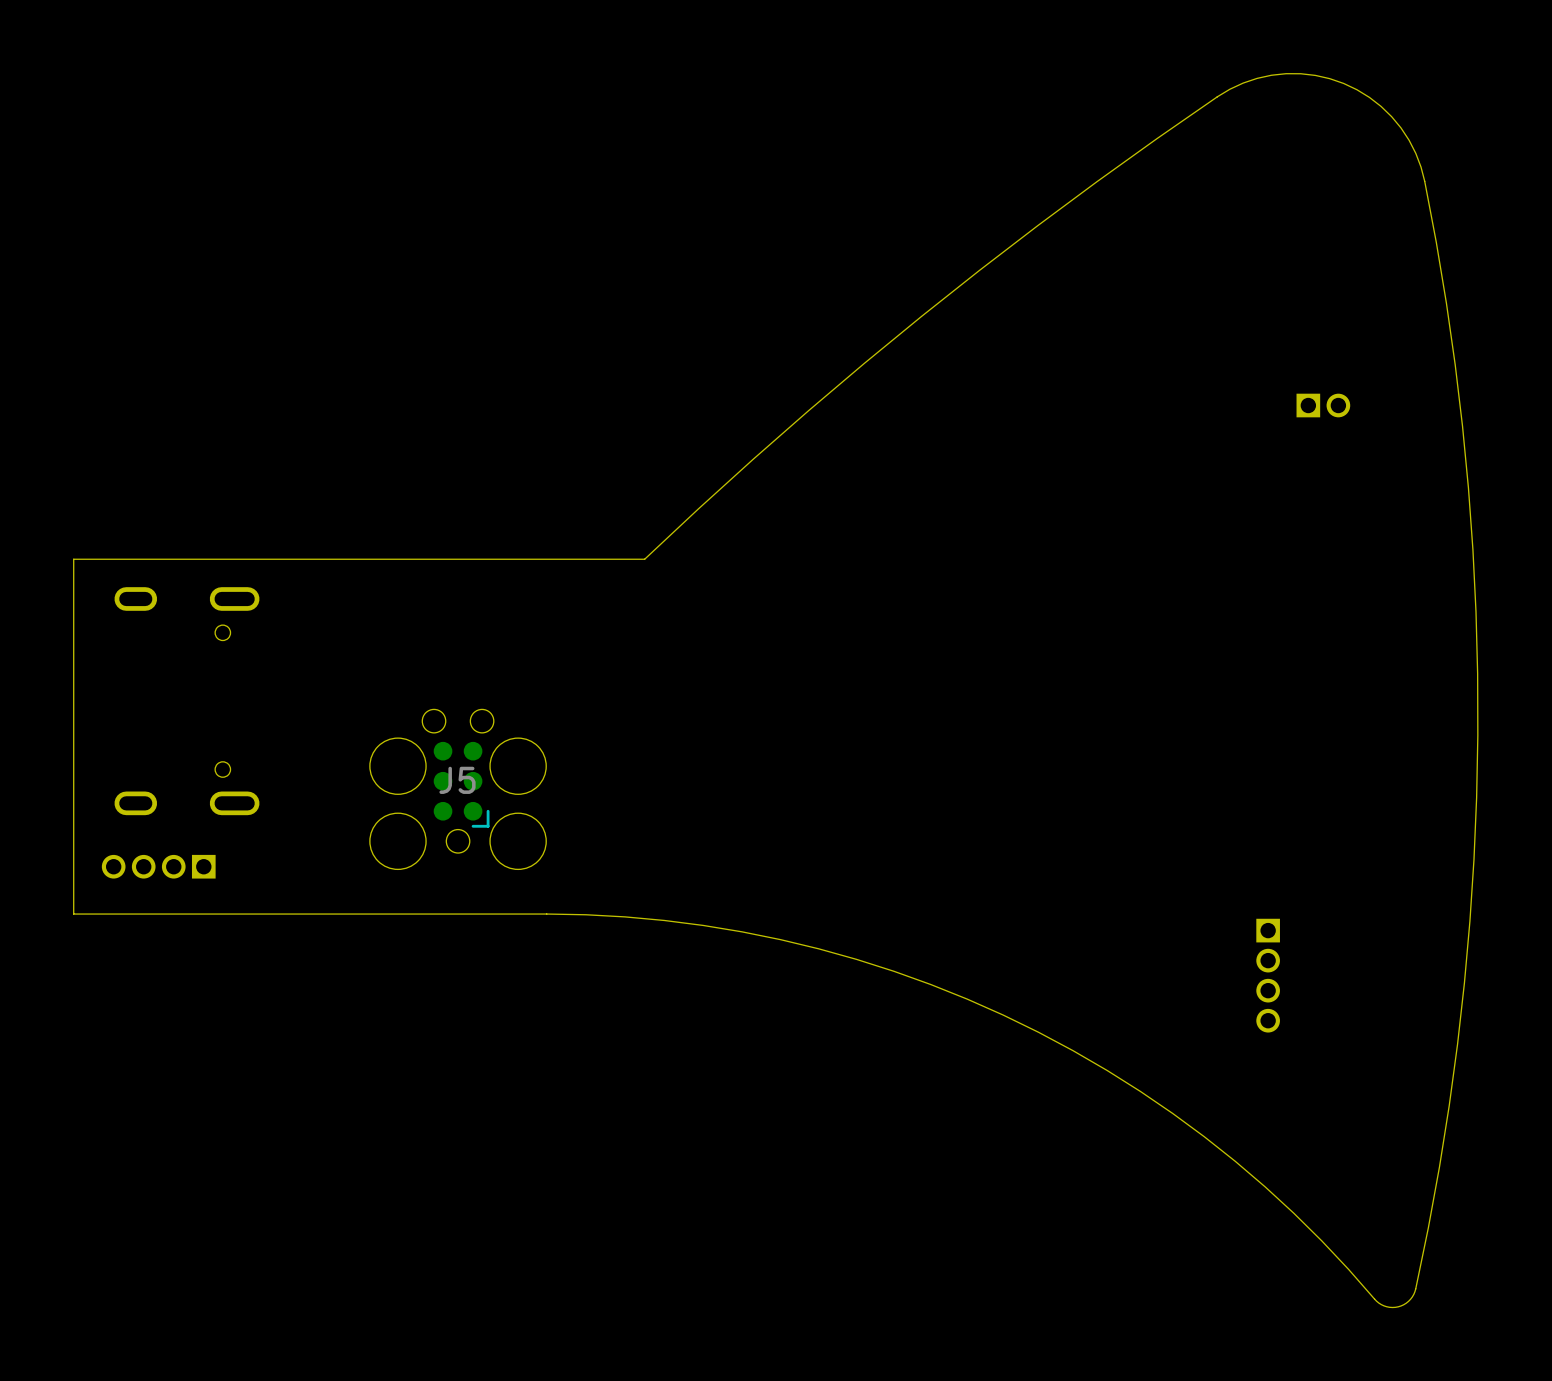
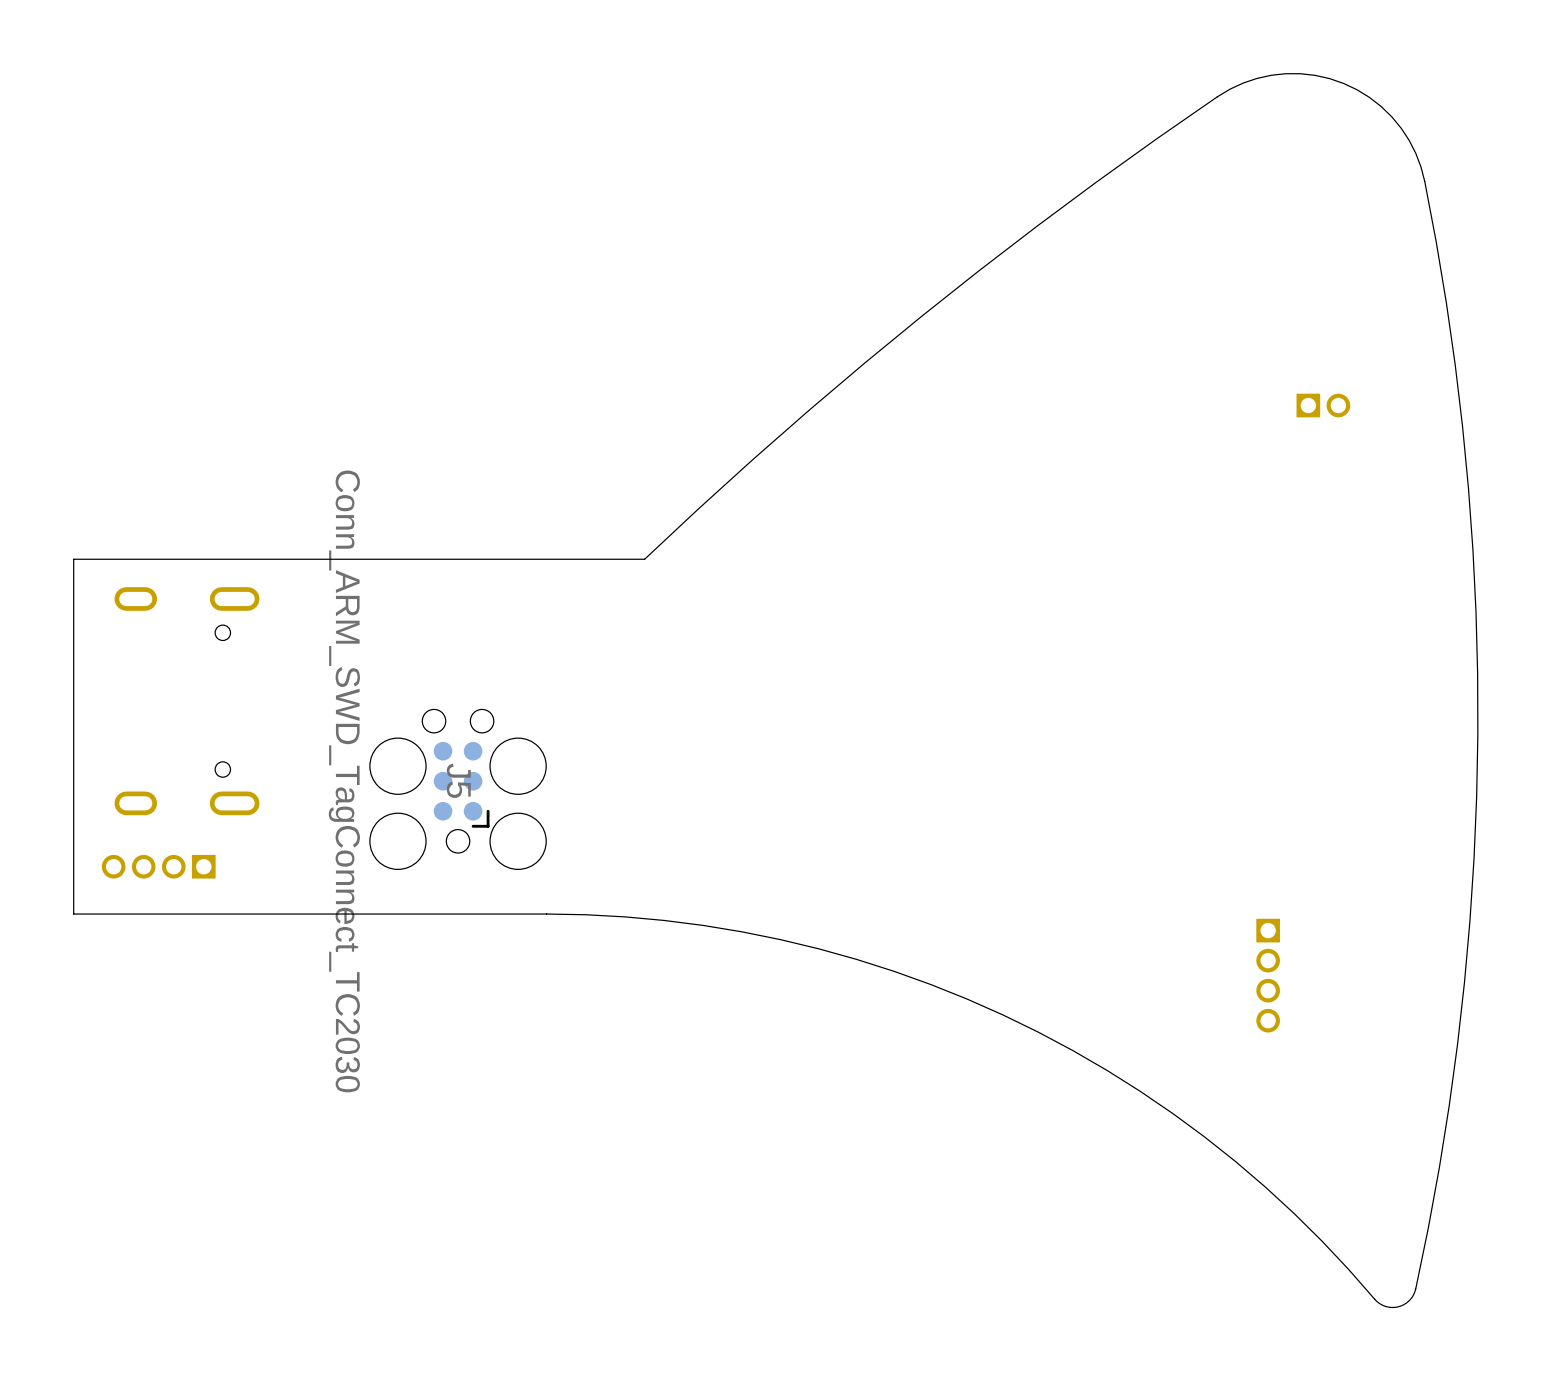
J5 name rotation: 0° (457, 780) -> 90° clockwise (458, 780)
J5 value: none -> Conn_ARM_SWD_TagConnect_TC2030 (344, 781)

